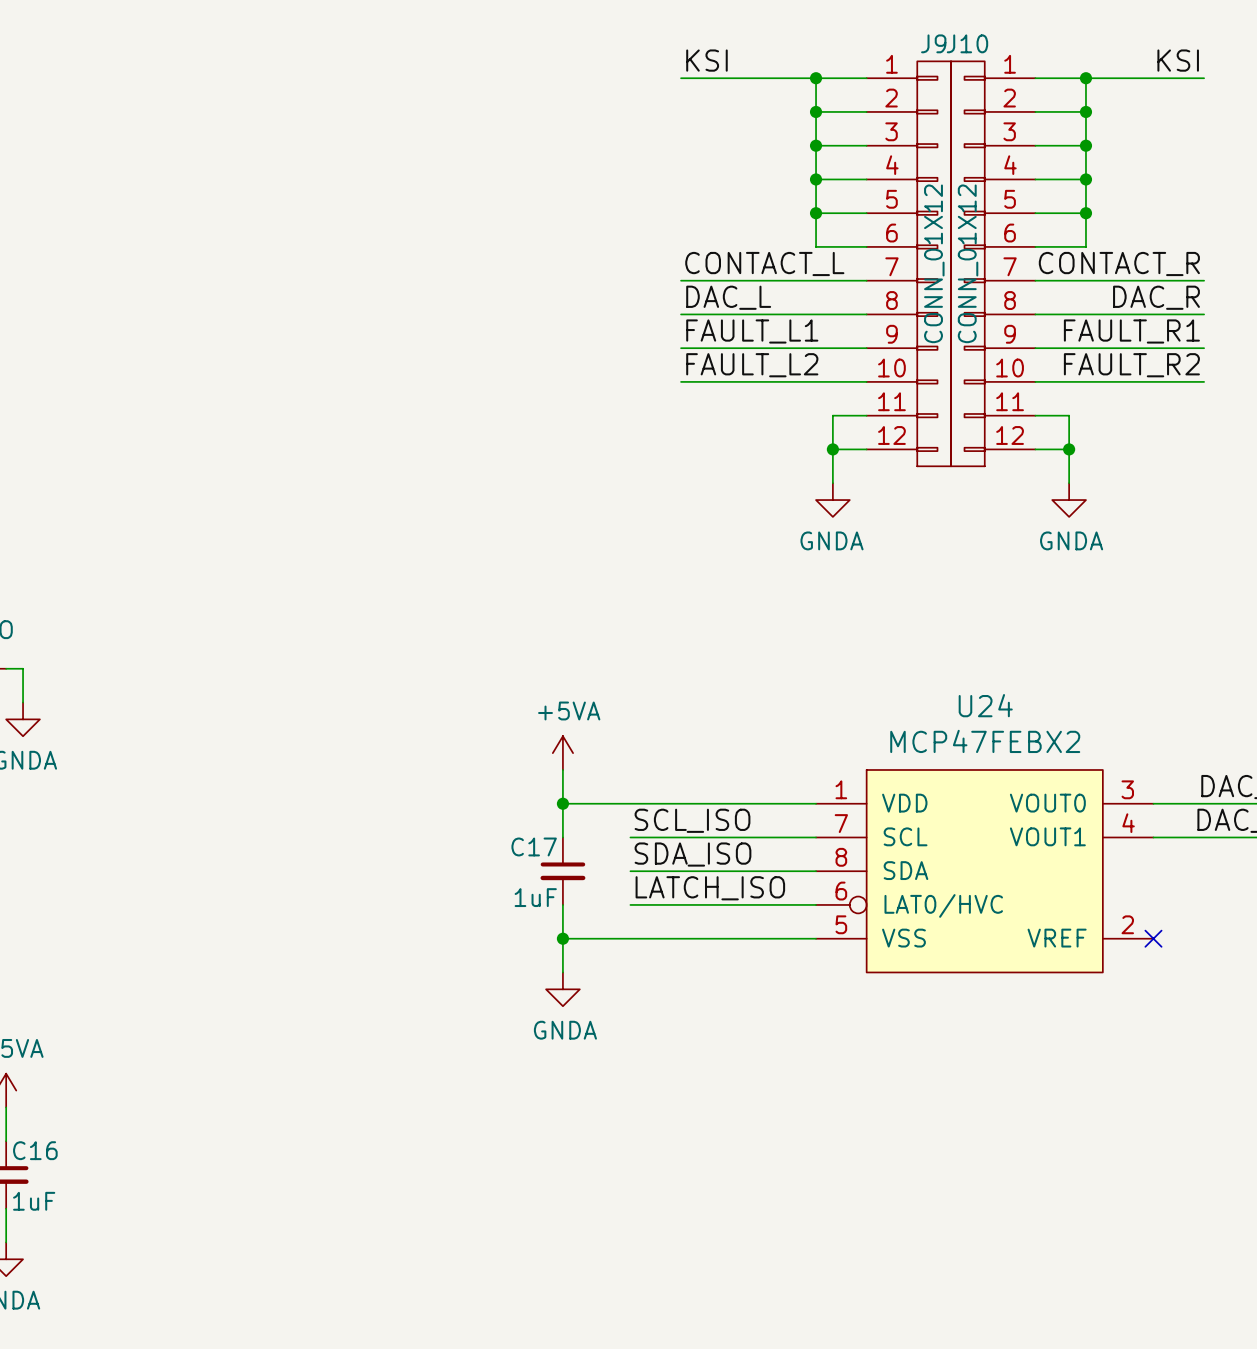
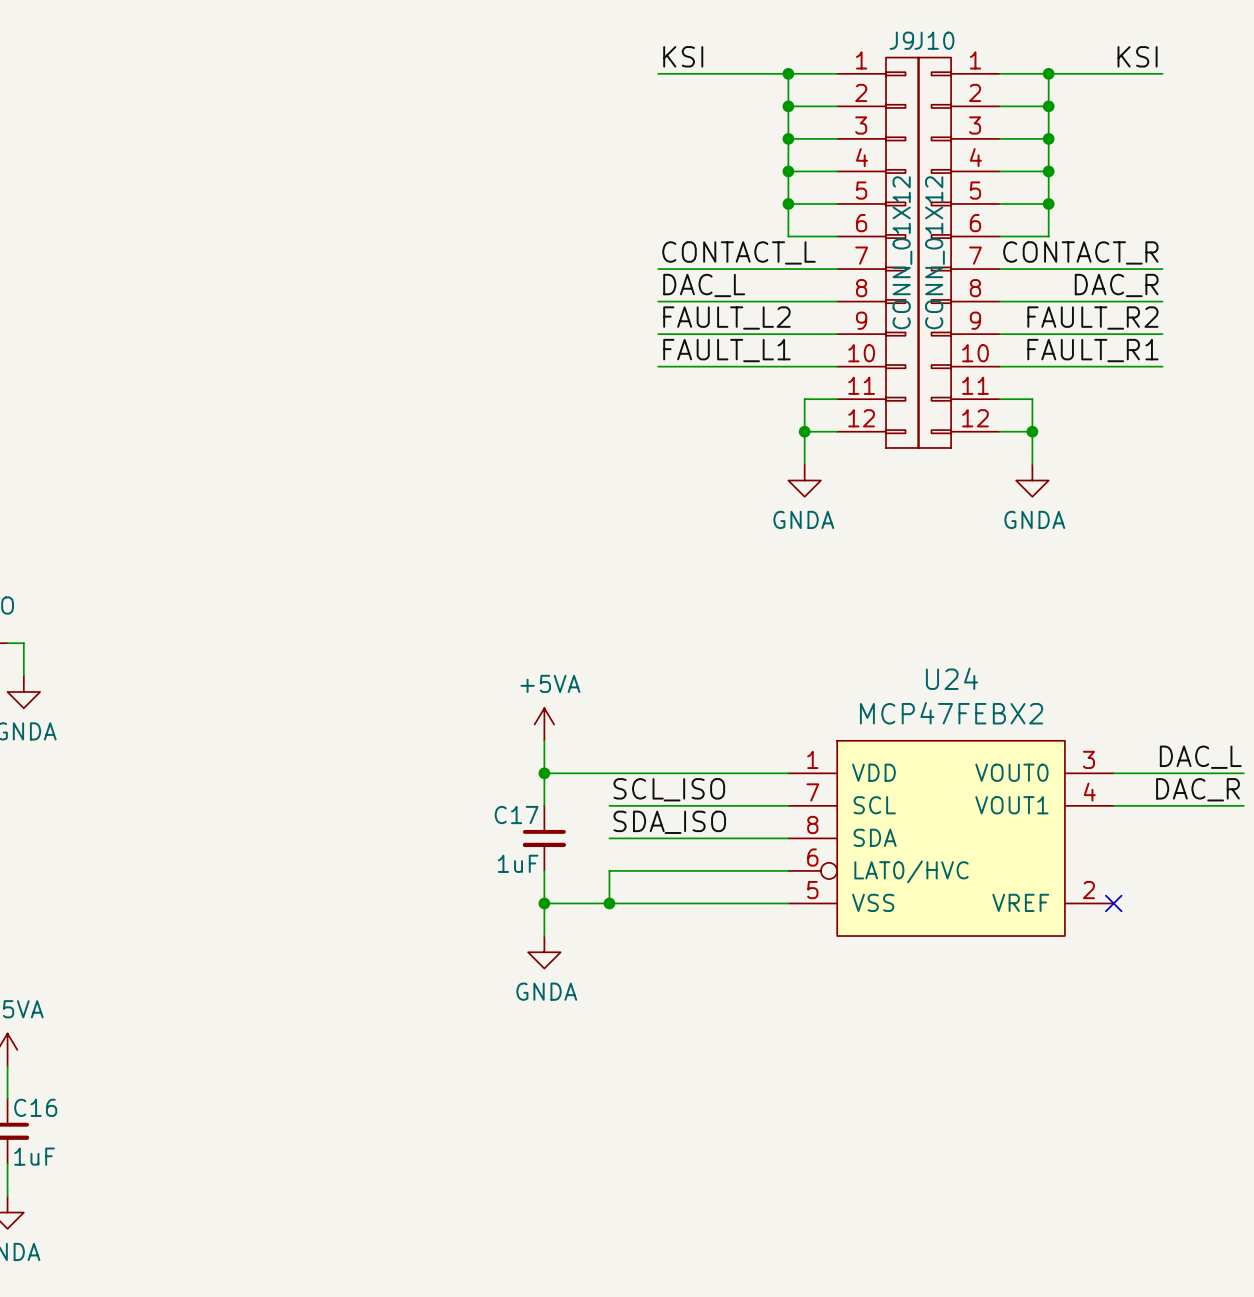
label: FAULT_L1 (752, 331) -> FAULT_L2 (726, 318)
label: FAULT_R1 (1131, 331) -> FAULT_R2 (1092, 318)
label: FAULT_L2 (752, 365) -> FAULT_L1 (726, 350)
label: FAULT_R2 (1131, 365) -> FAULT_R1 (1092, 350)
label: LATCH_ISO (710, 888) -> none
wire: none -> (609, 870) (609, 903)
junction: none -> (609, 903)

